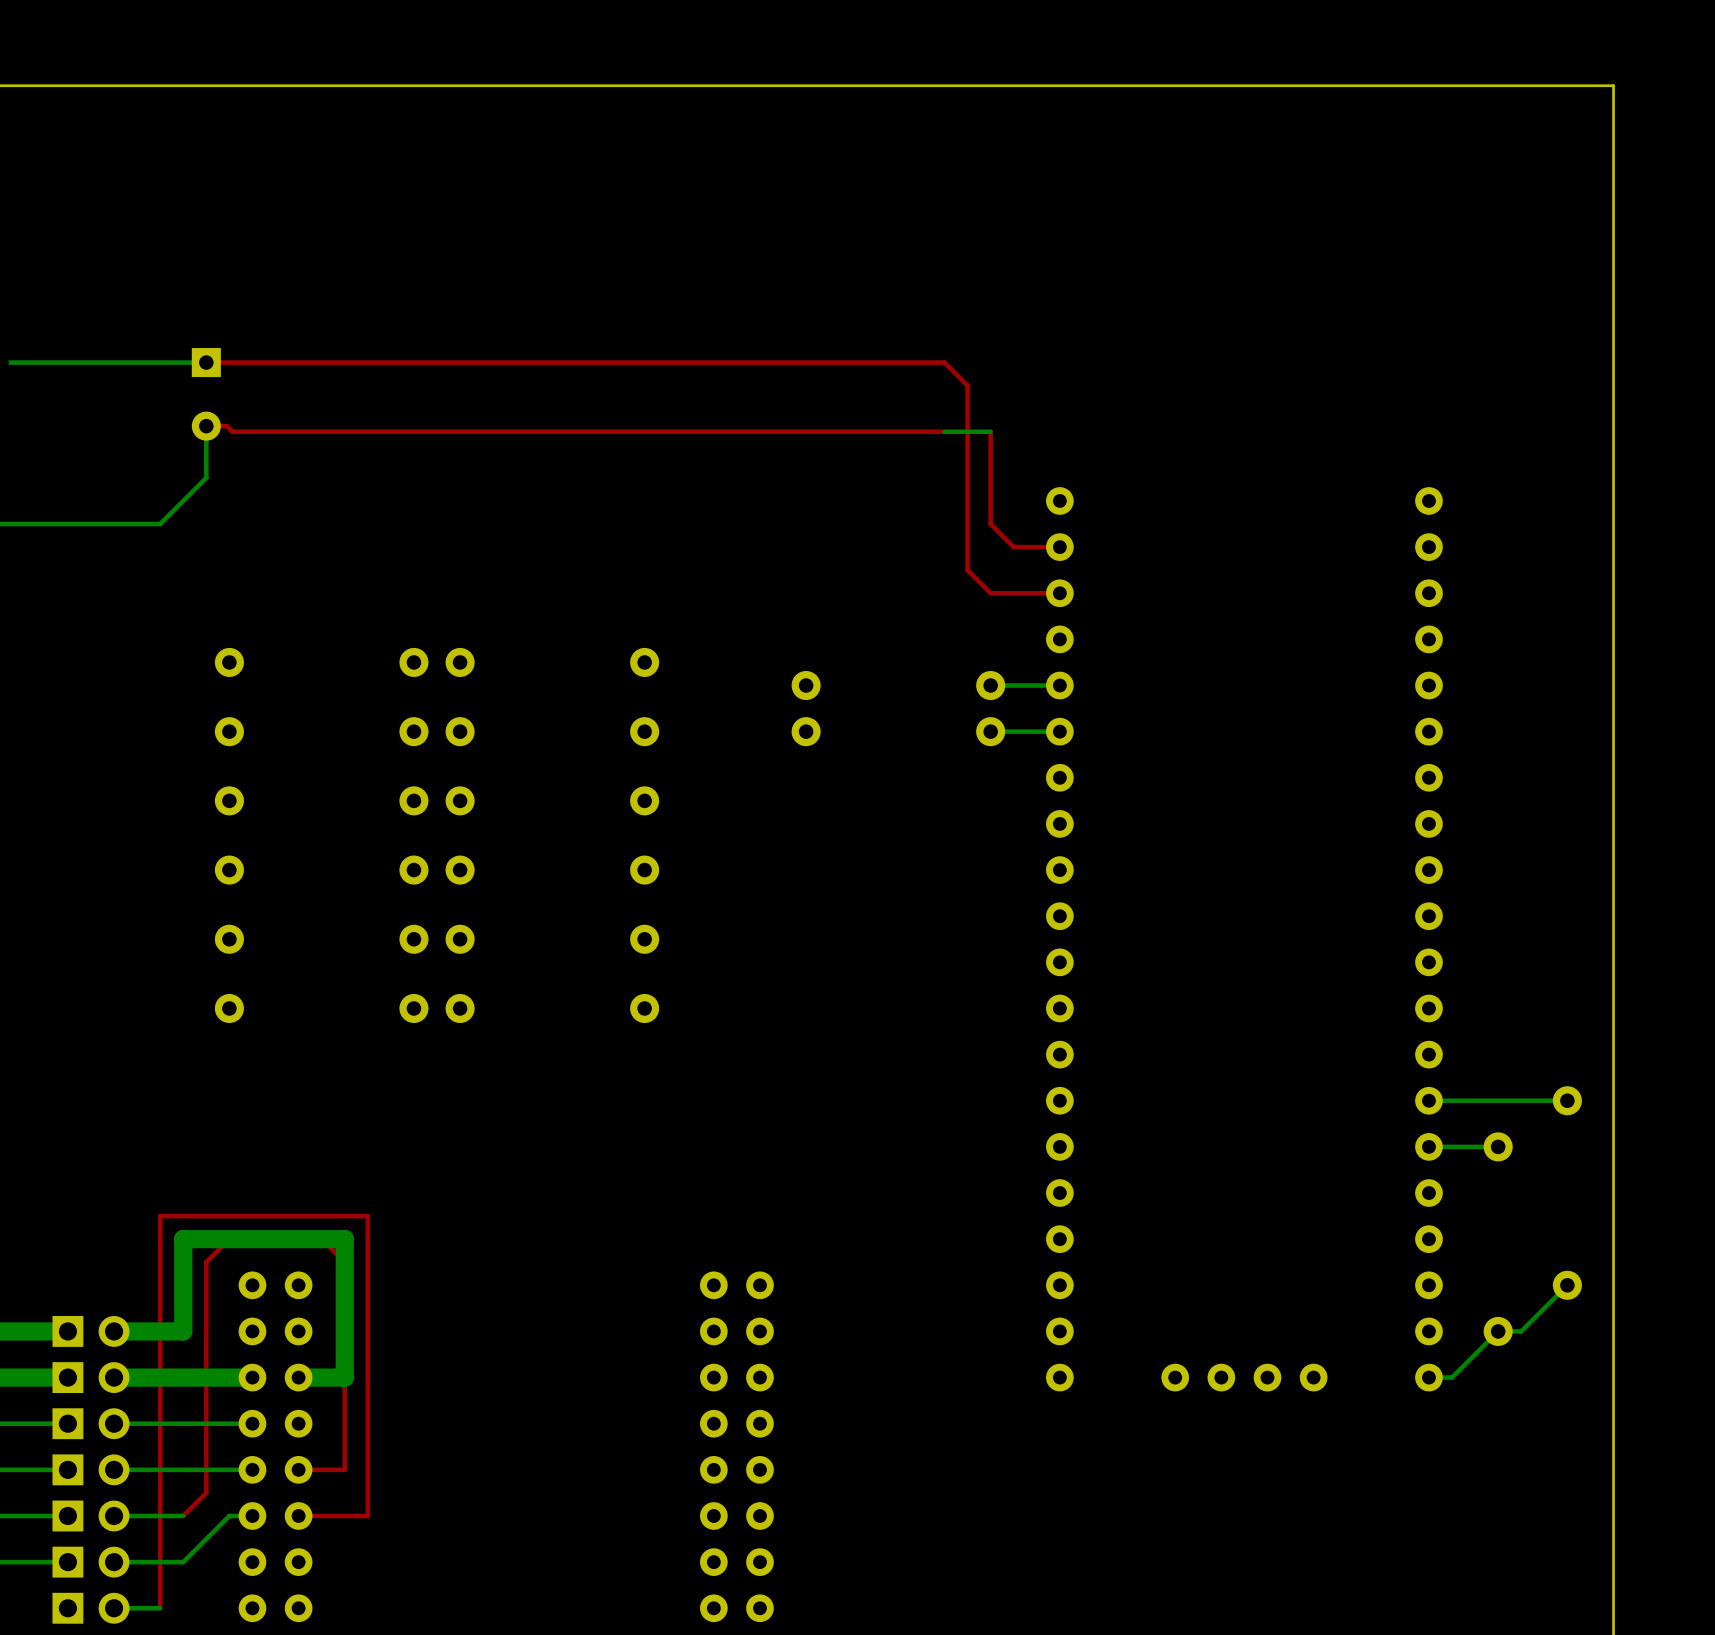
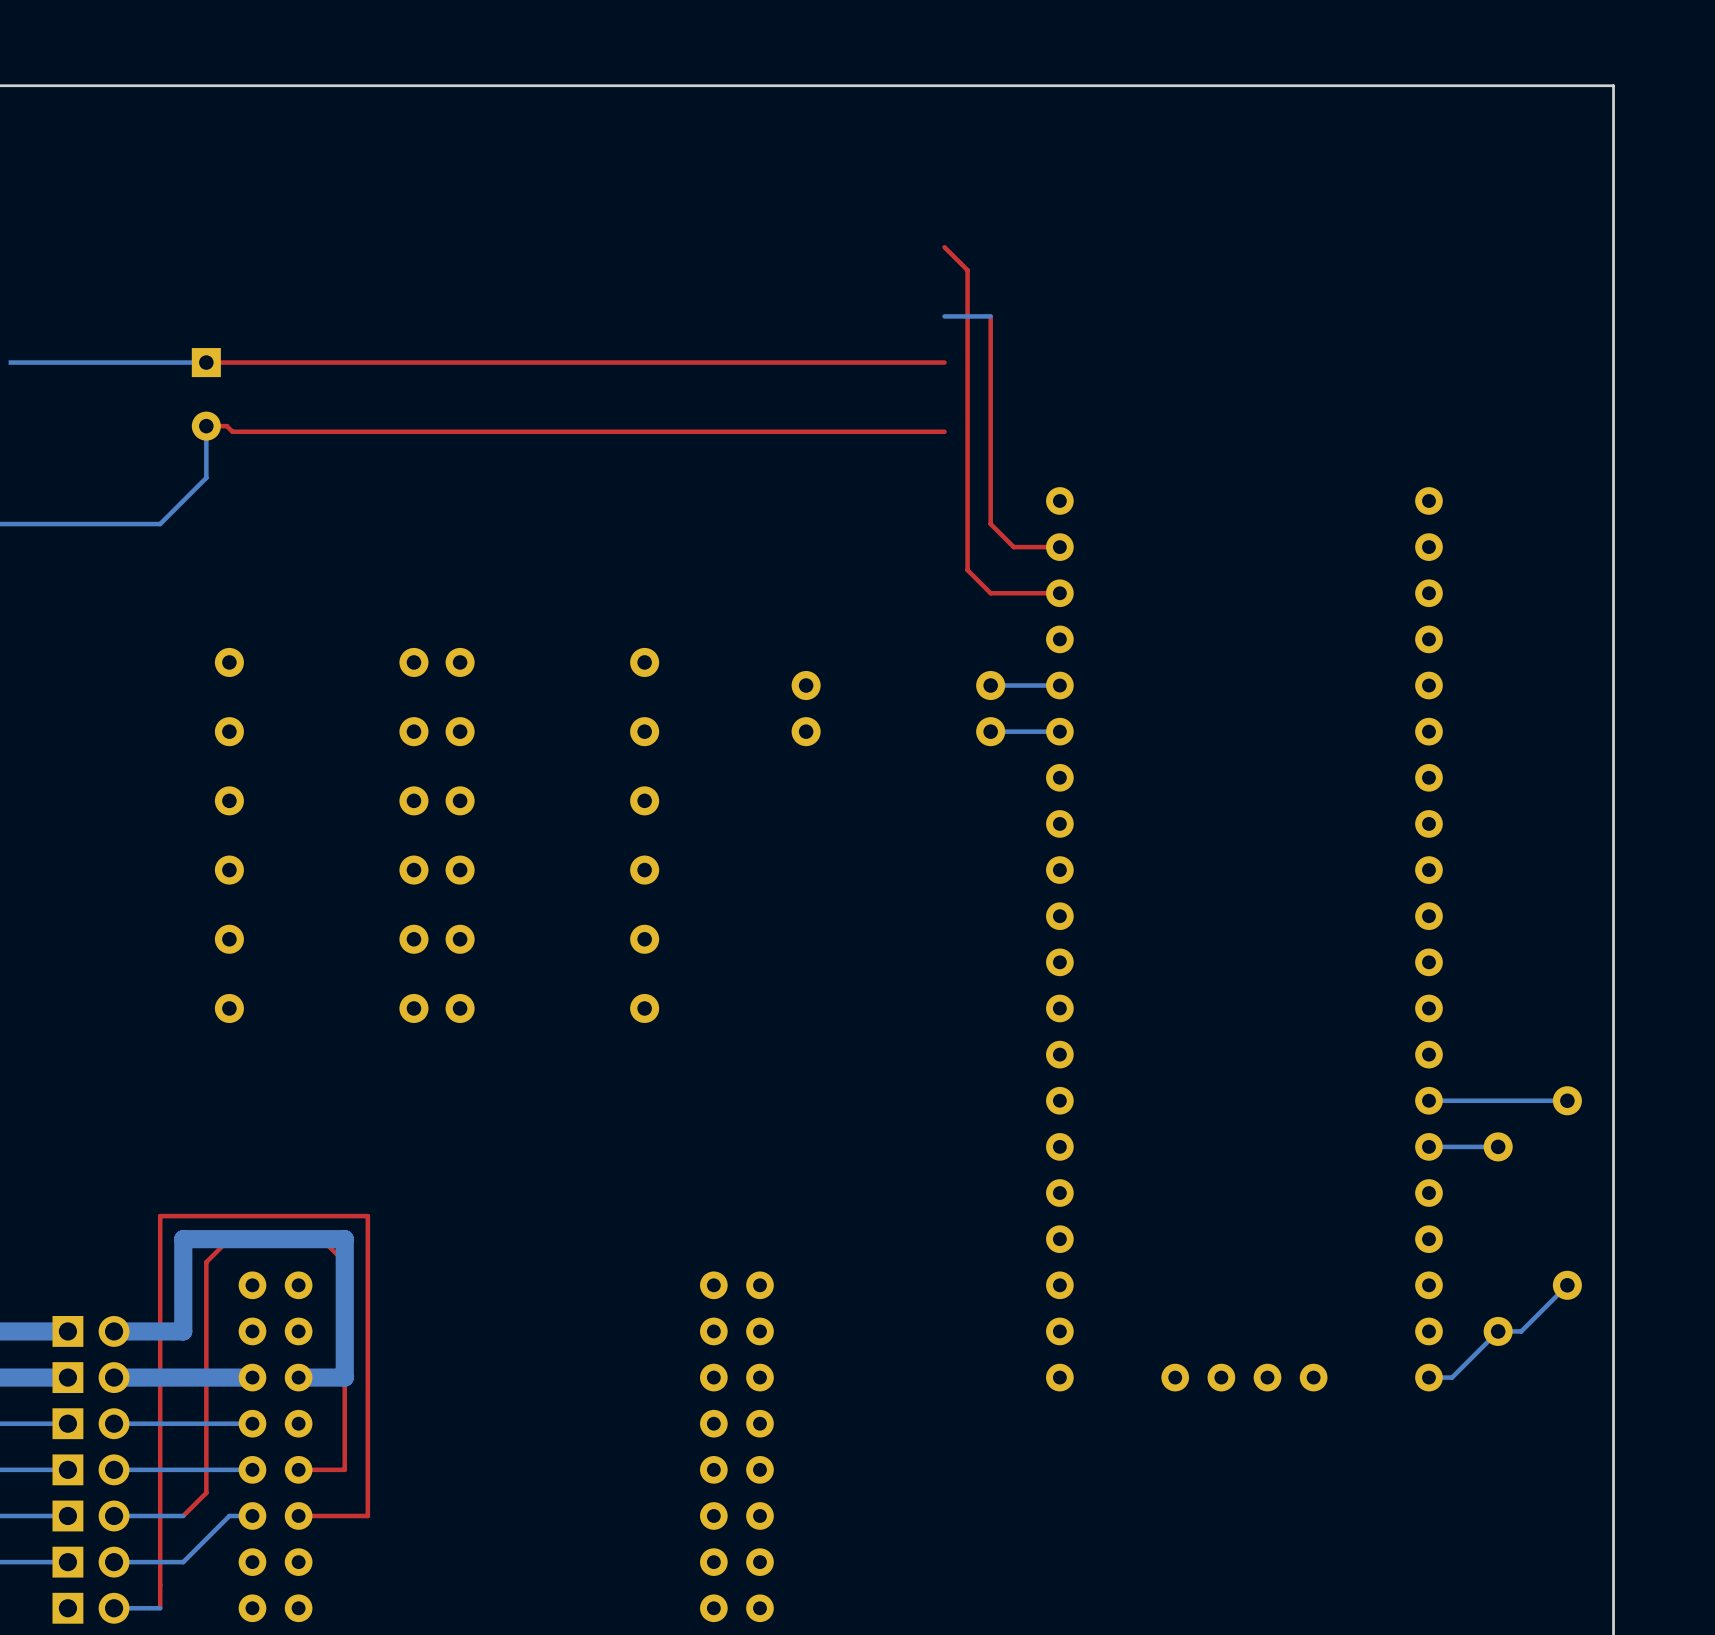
top track: none -> (990, 316) (990, 431)
top track: (944, 362) (967, 385) -> (944, 247) (967, 270) (967, 385)
bottom track: (990, 431) (944, 431) -> (990, 316) (944, 316)

